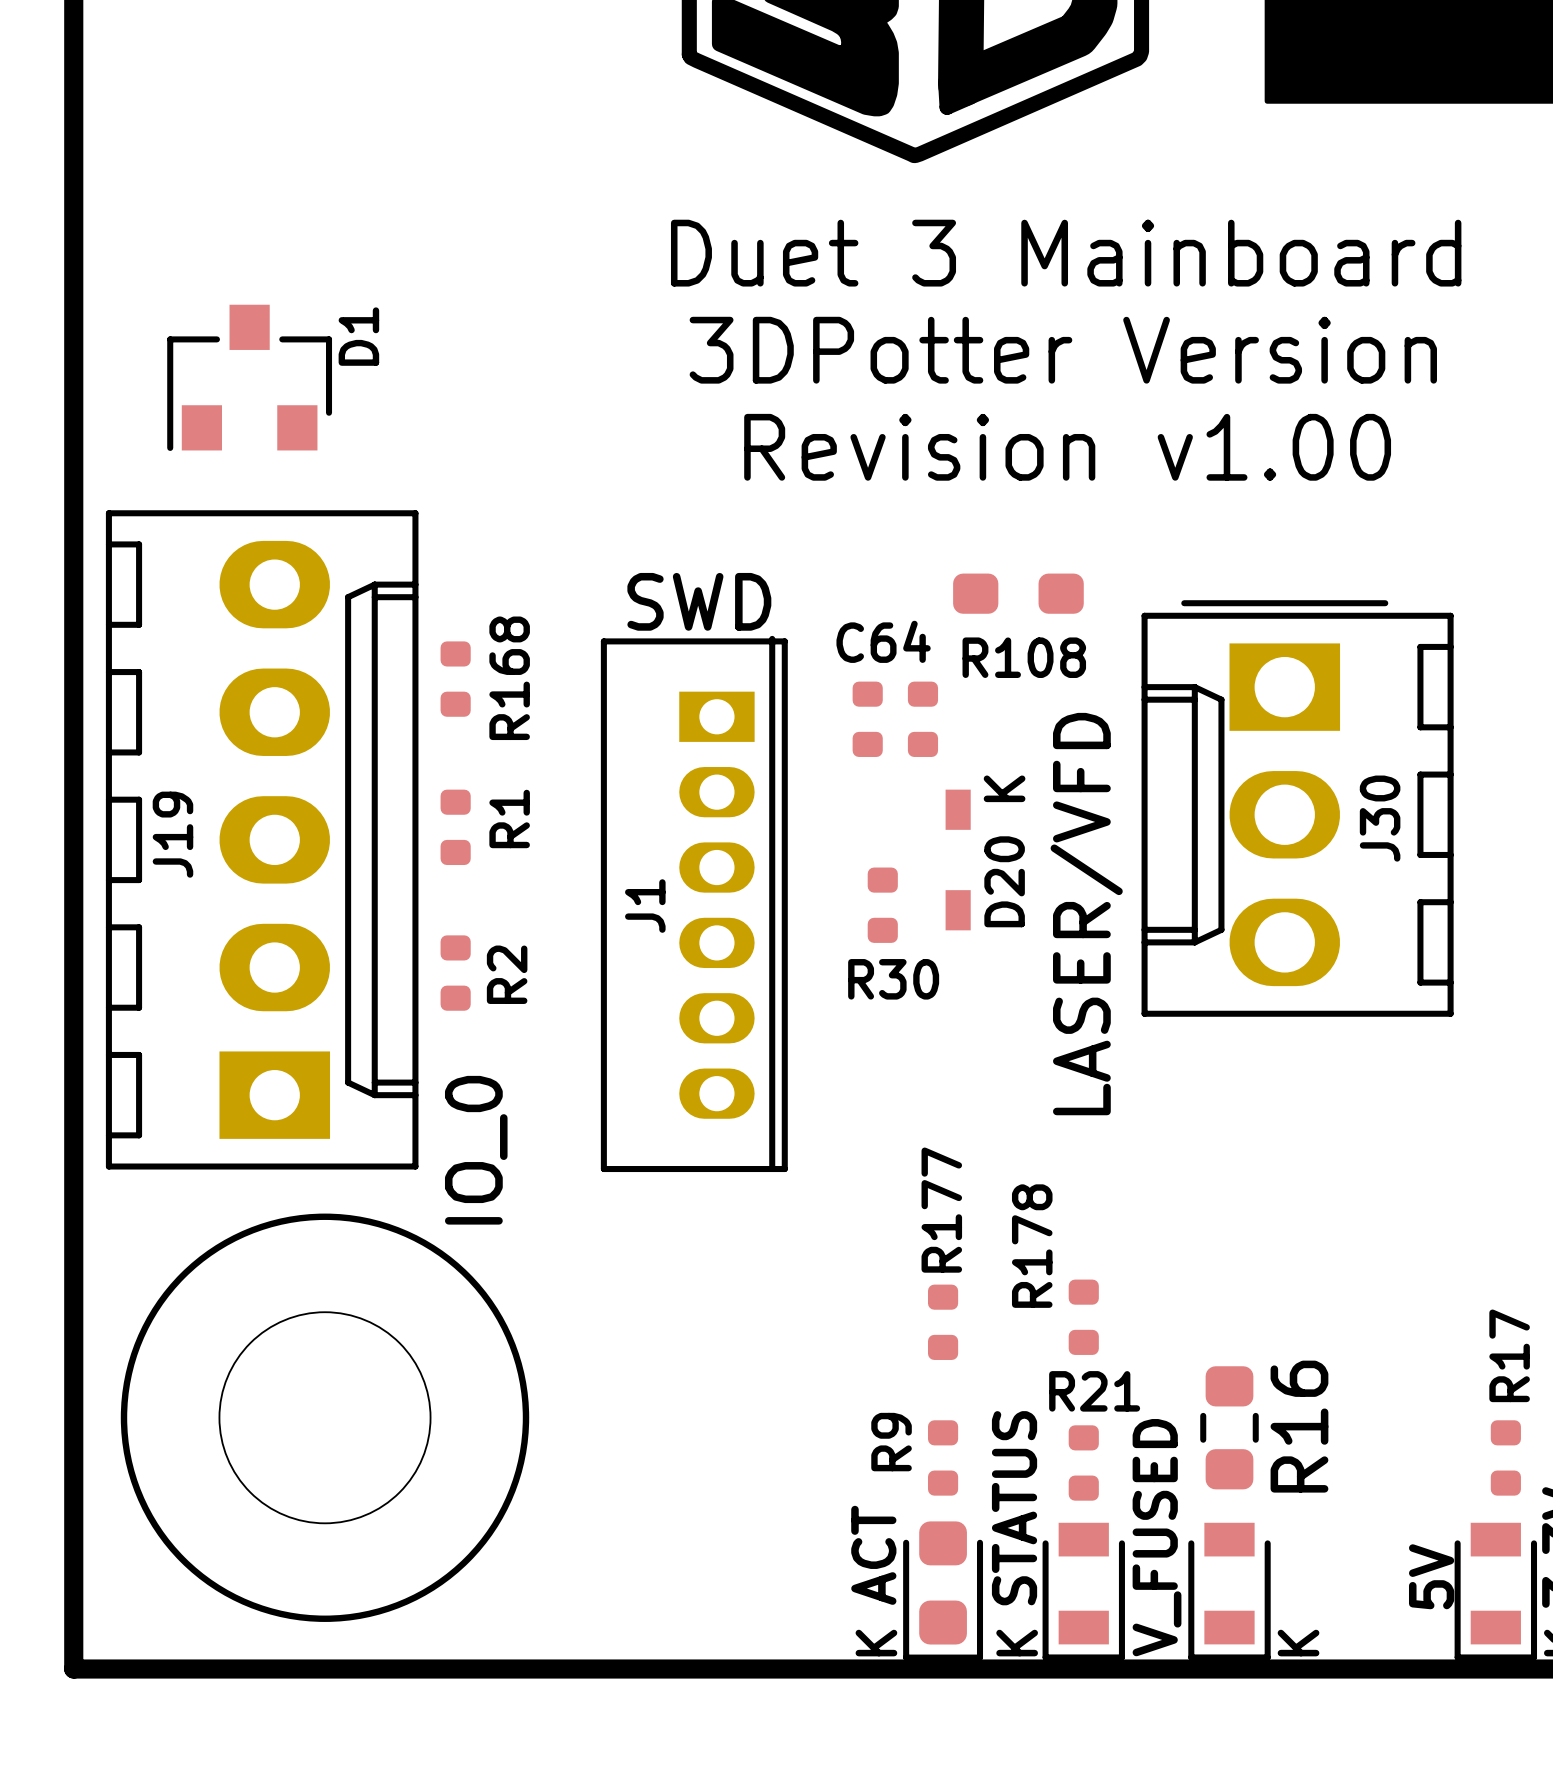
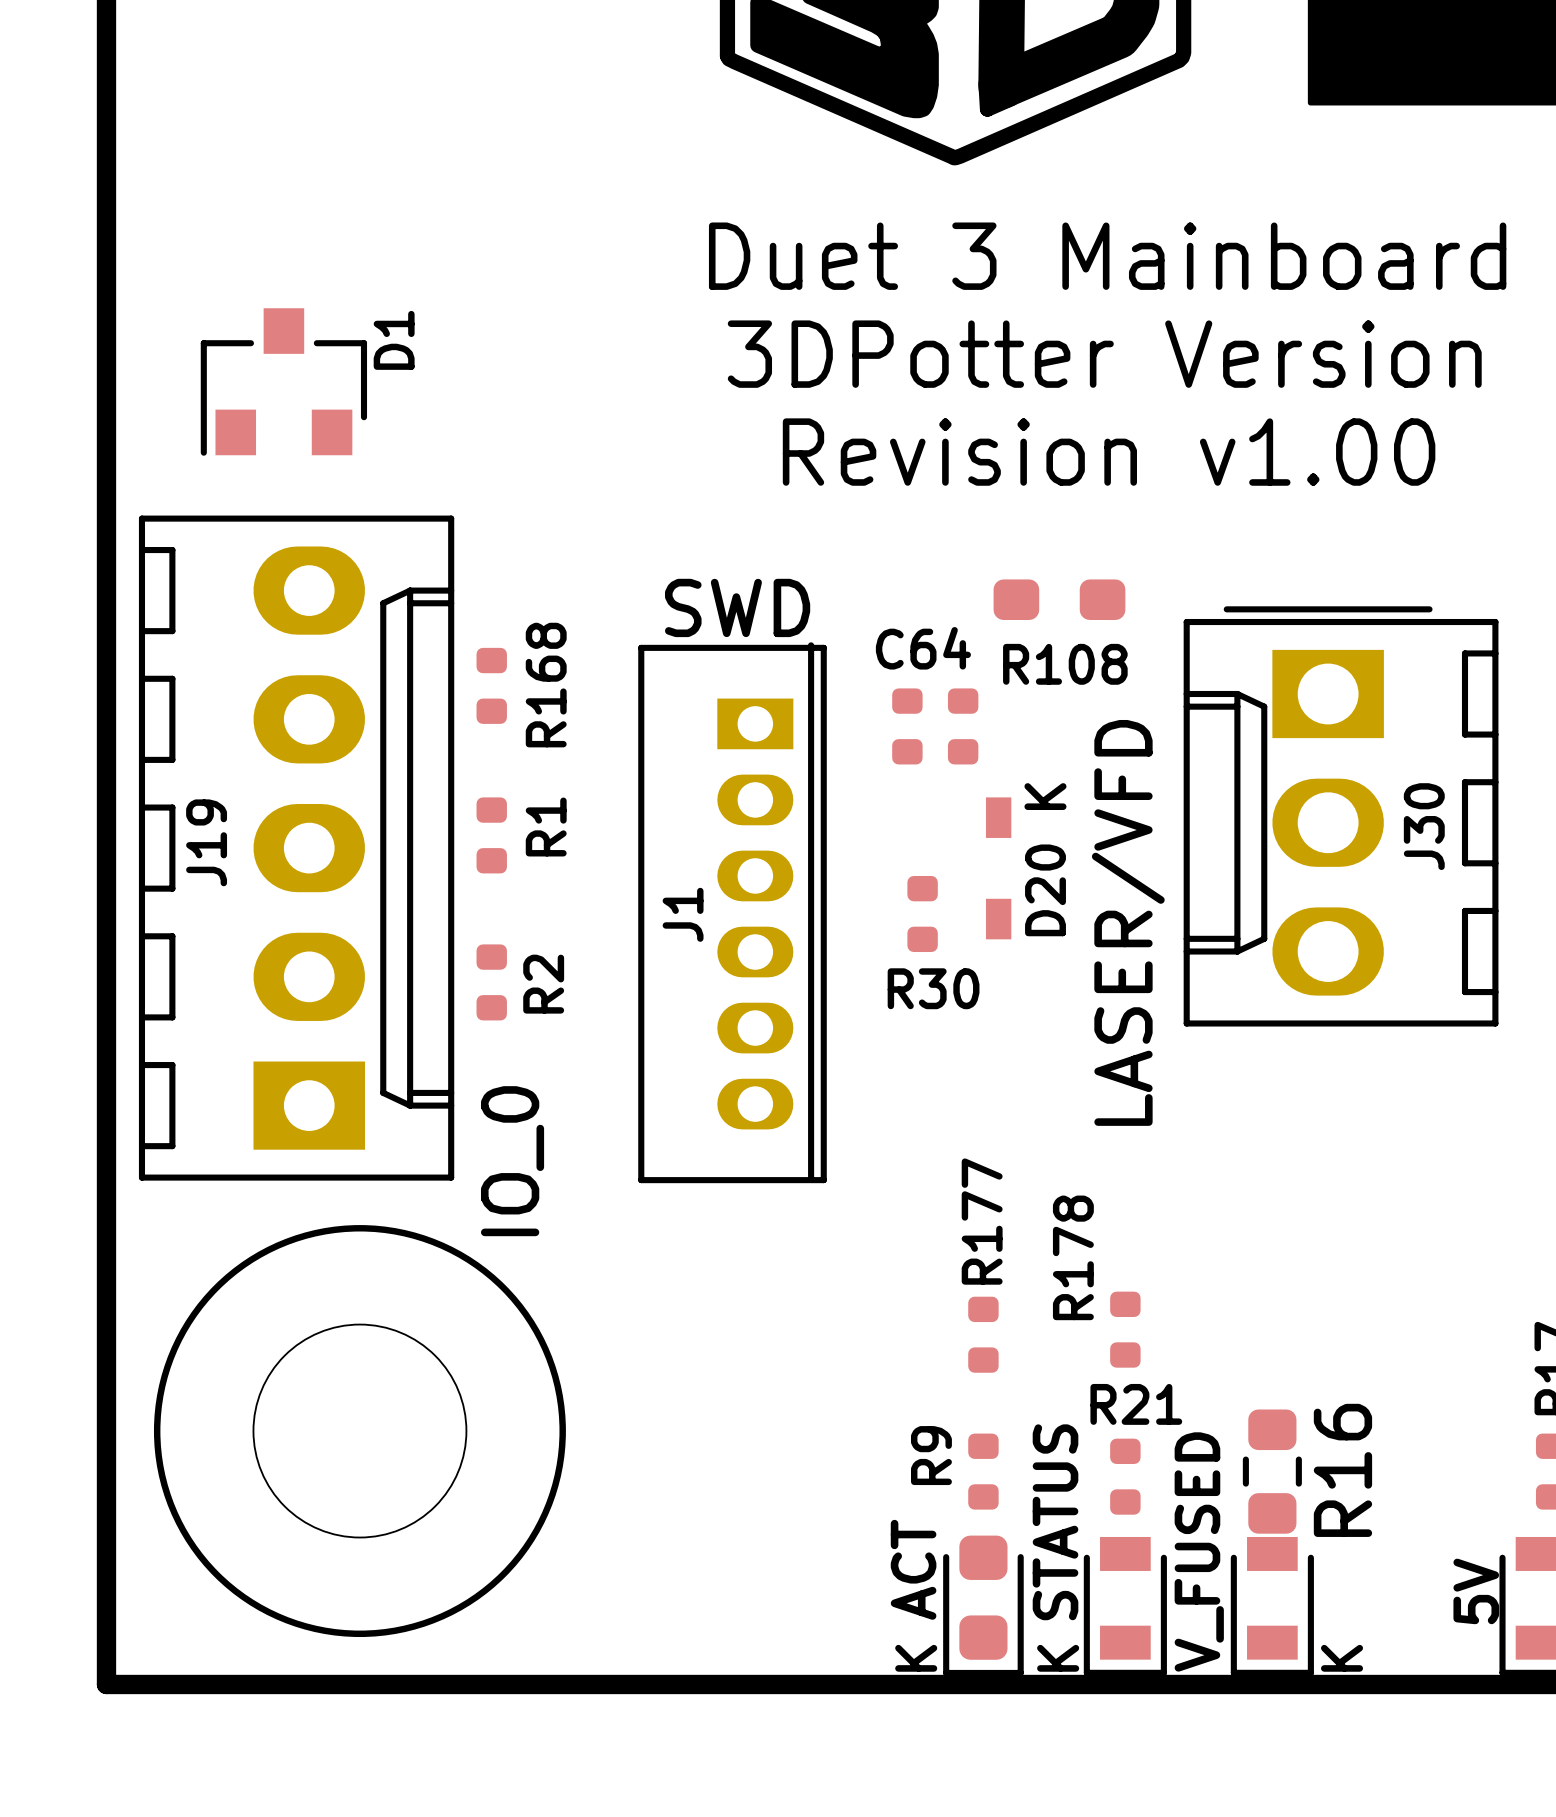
R16 position: (1229, 1427) -> (1272, 1471)

